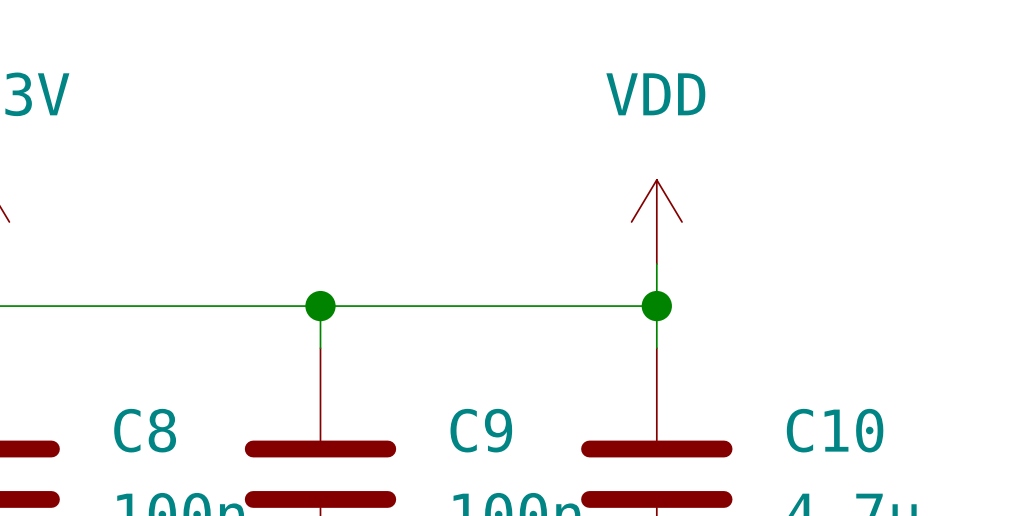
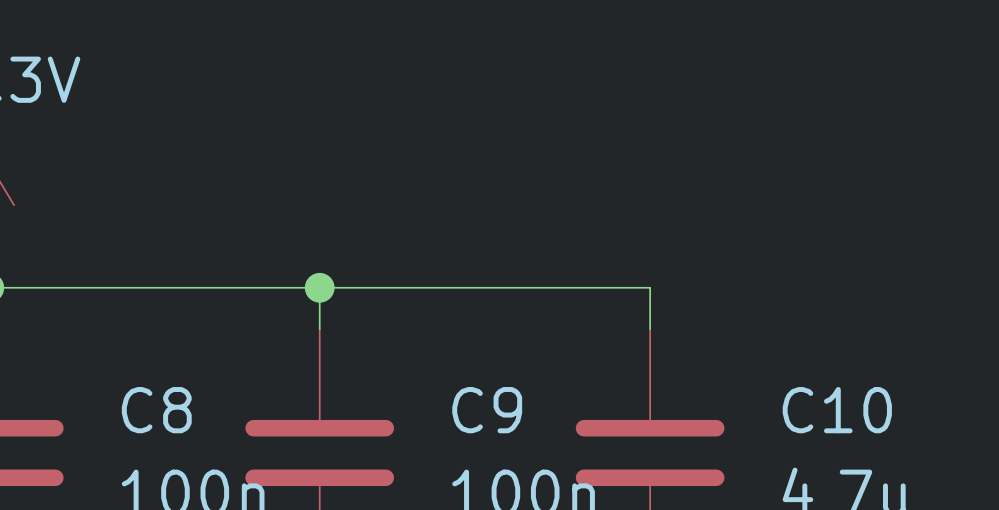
power symbol: VDD (656, 221) -> none
wire: (656, 264) (656, 306) -> none
junction: (656, 306) -> none

